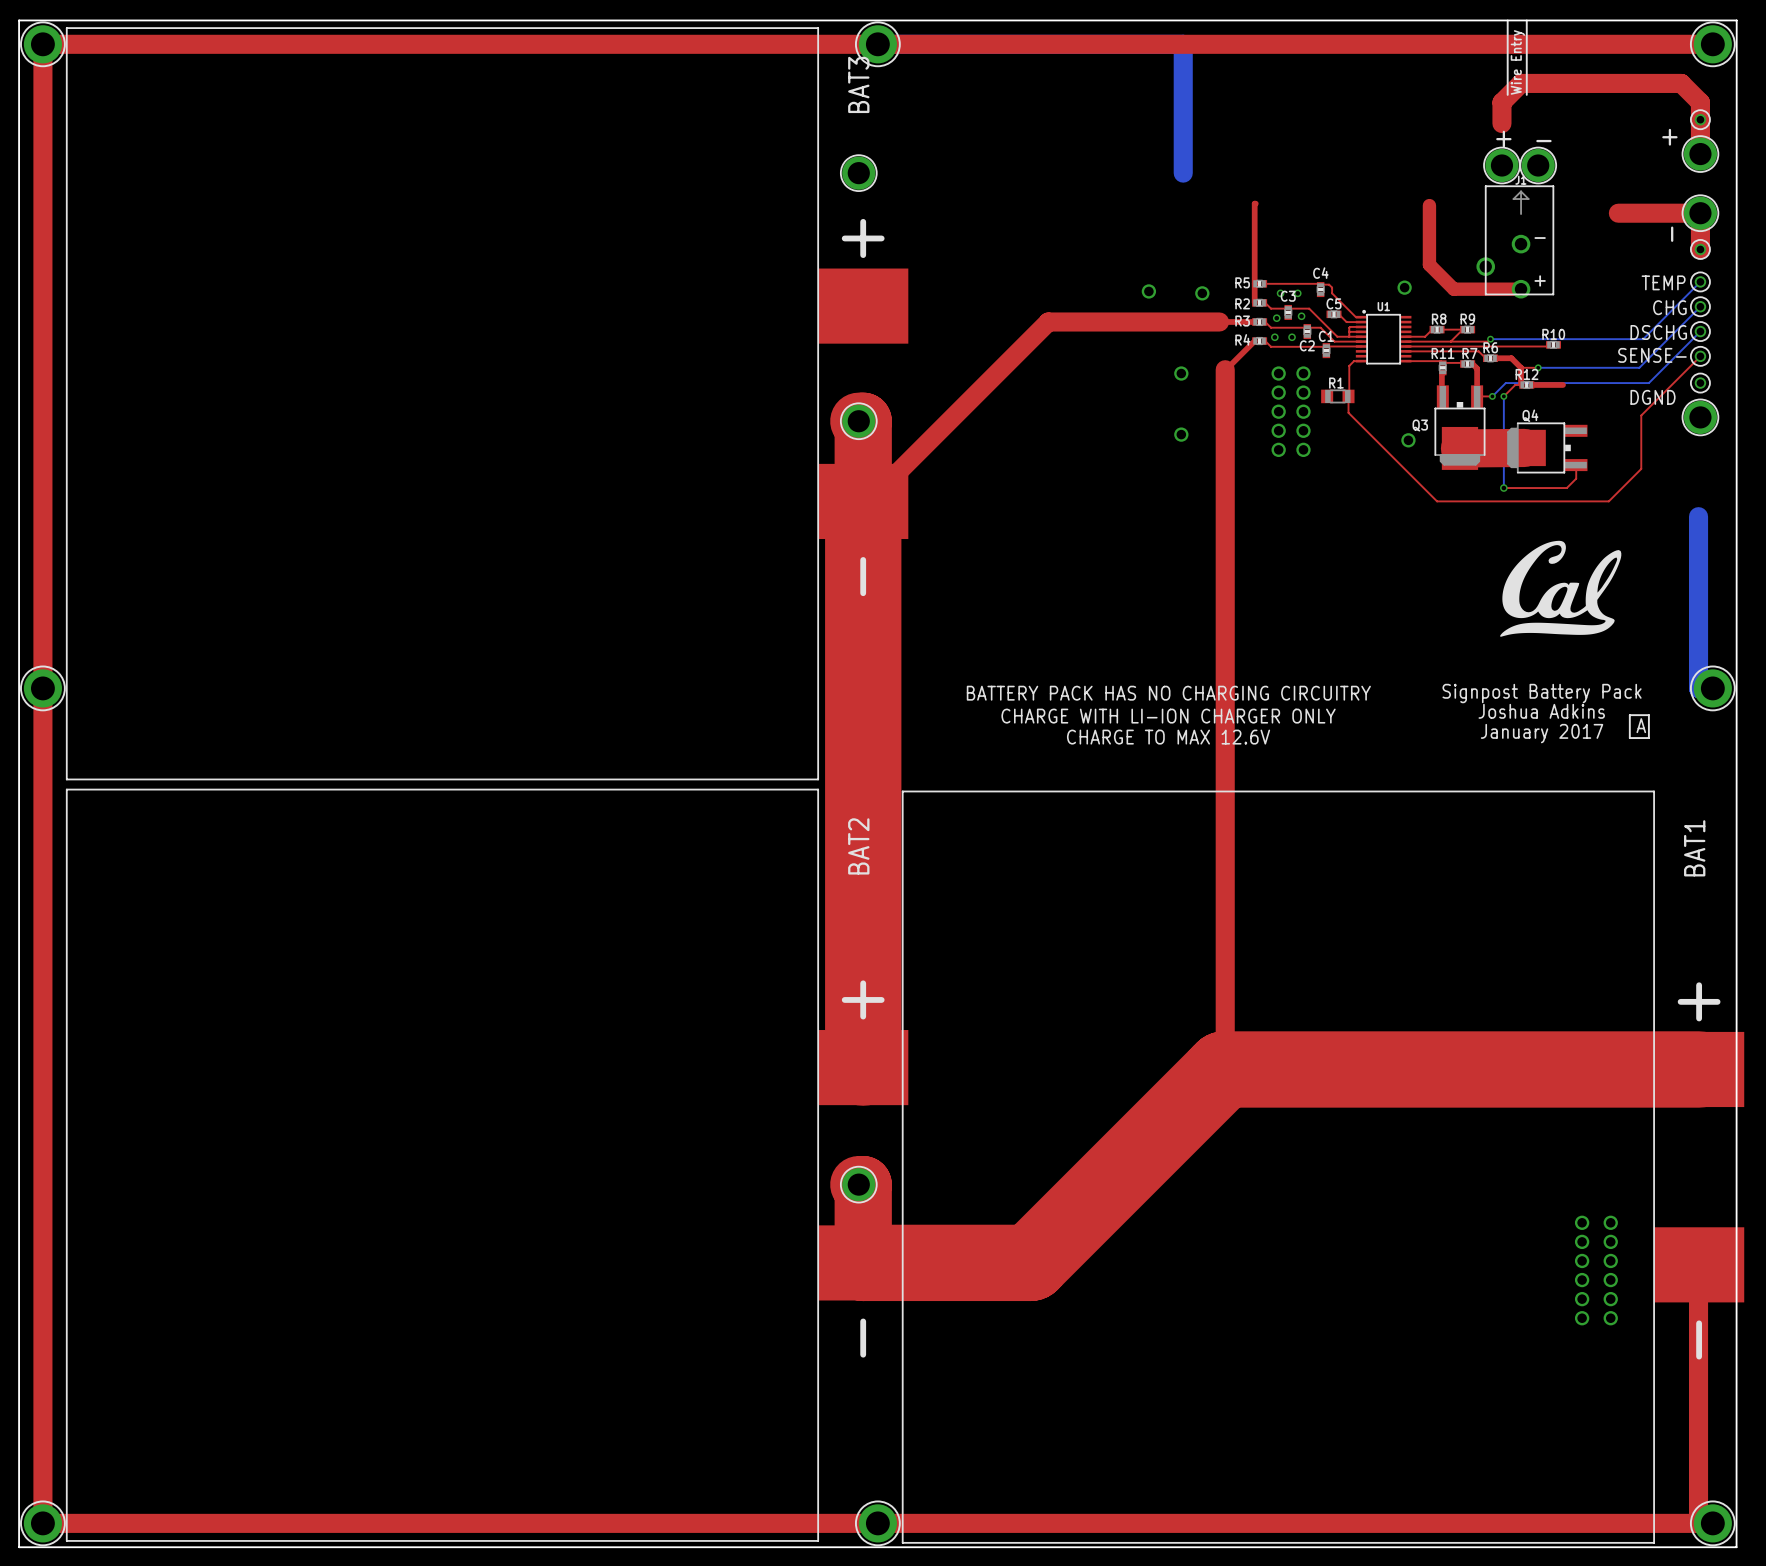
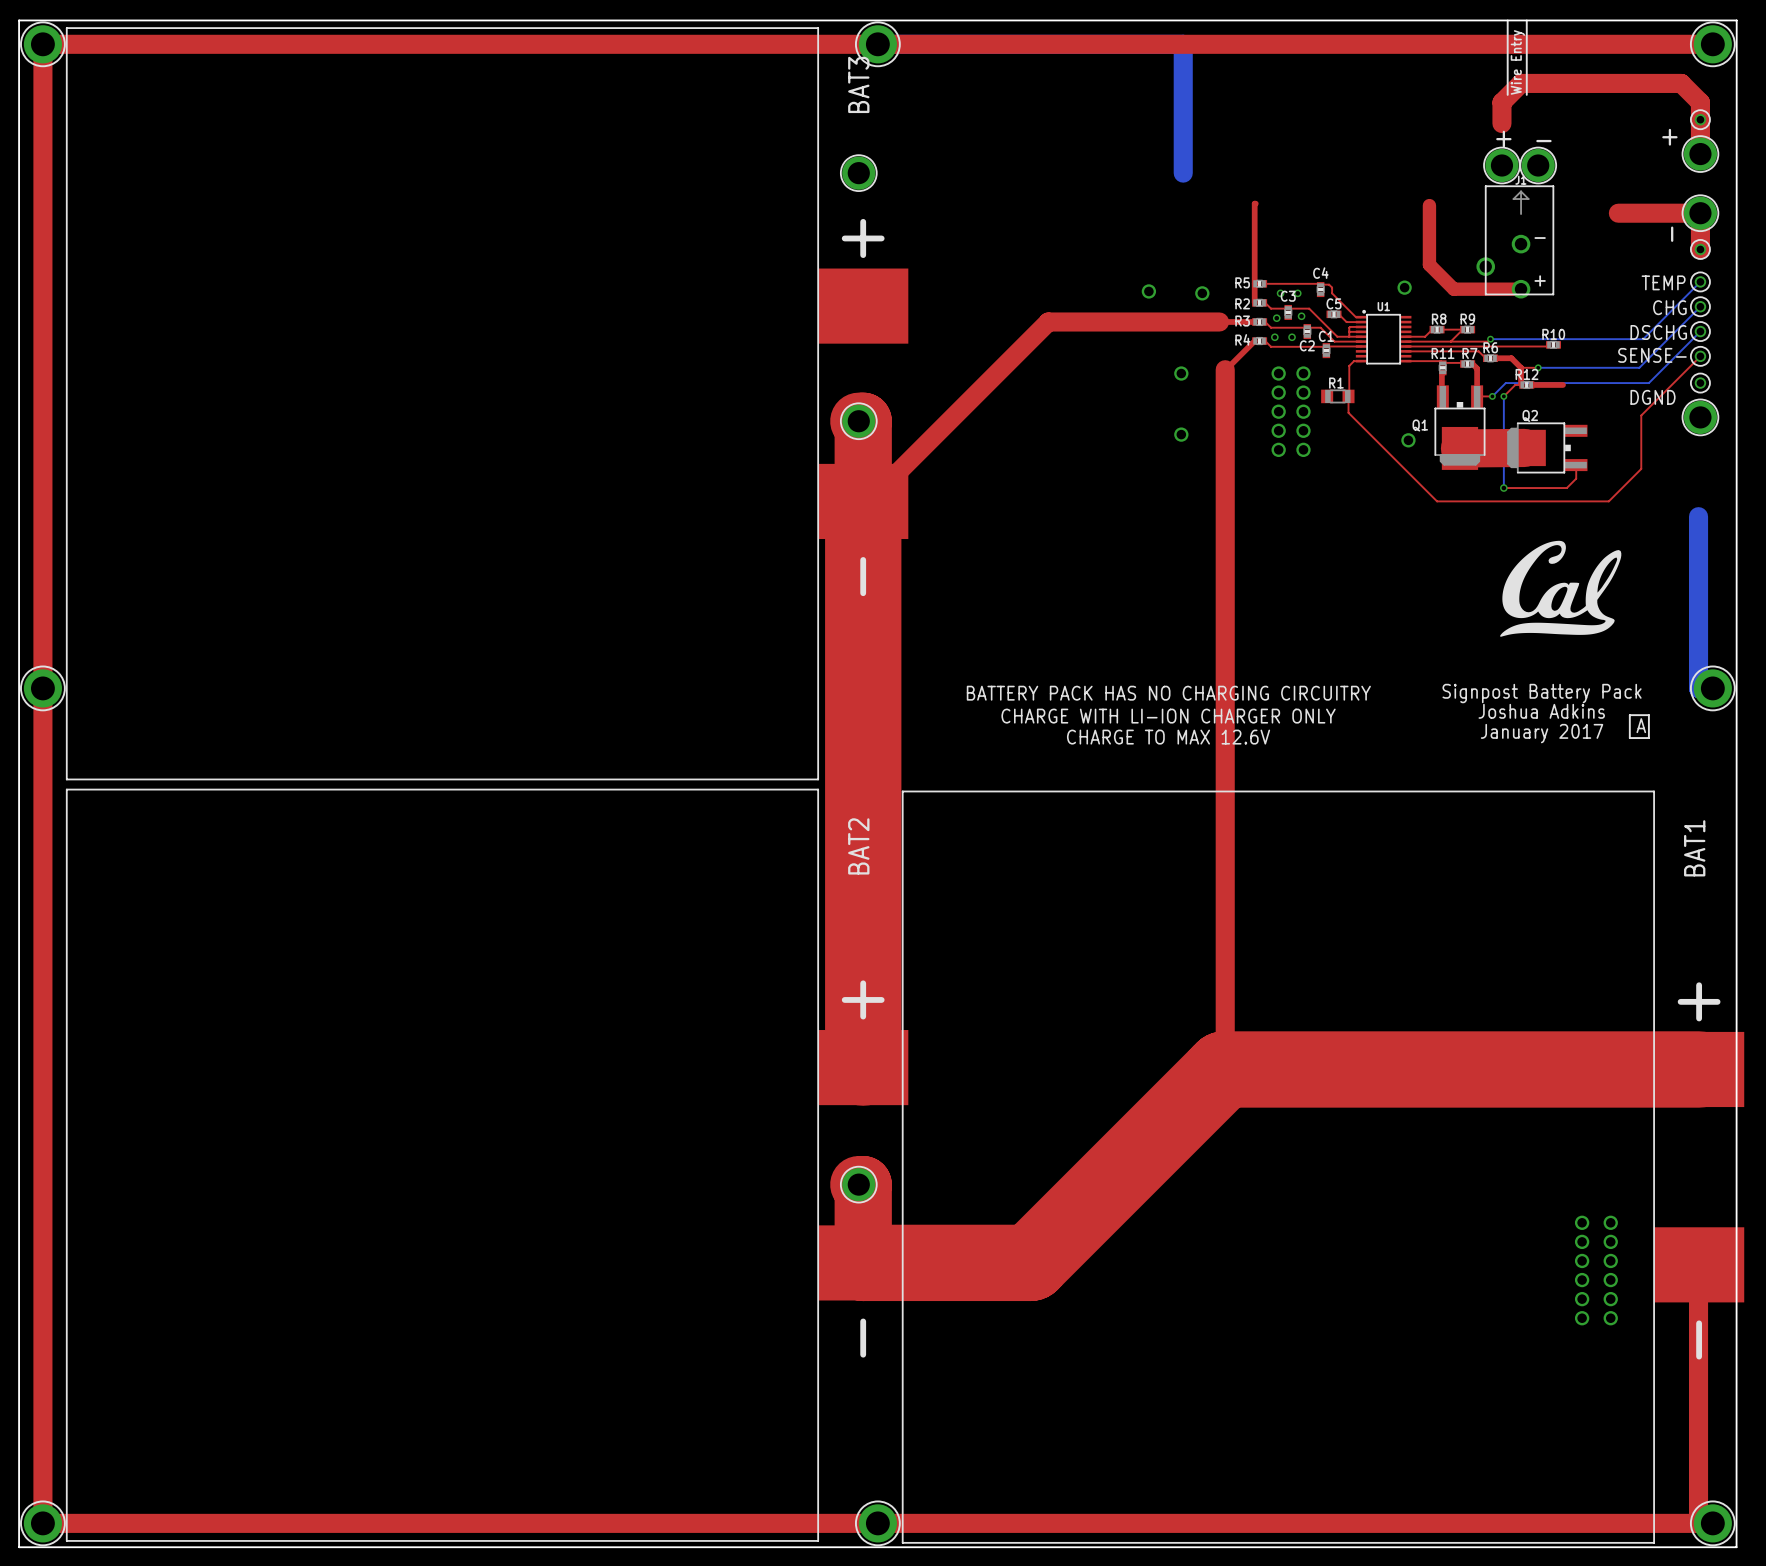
Q4 name: Q4 (1530, 415) -> Q2 (1530, 415)
Q3 name: Q3 (1420, 425) -> Q1 (1420, 425)

